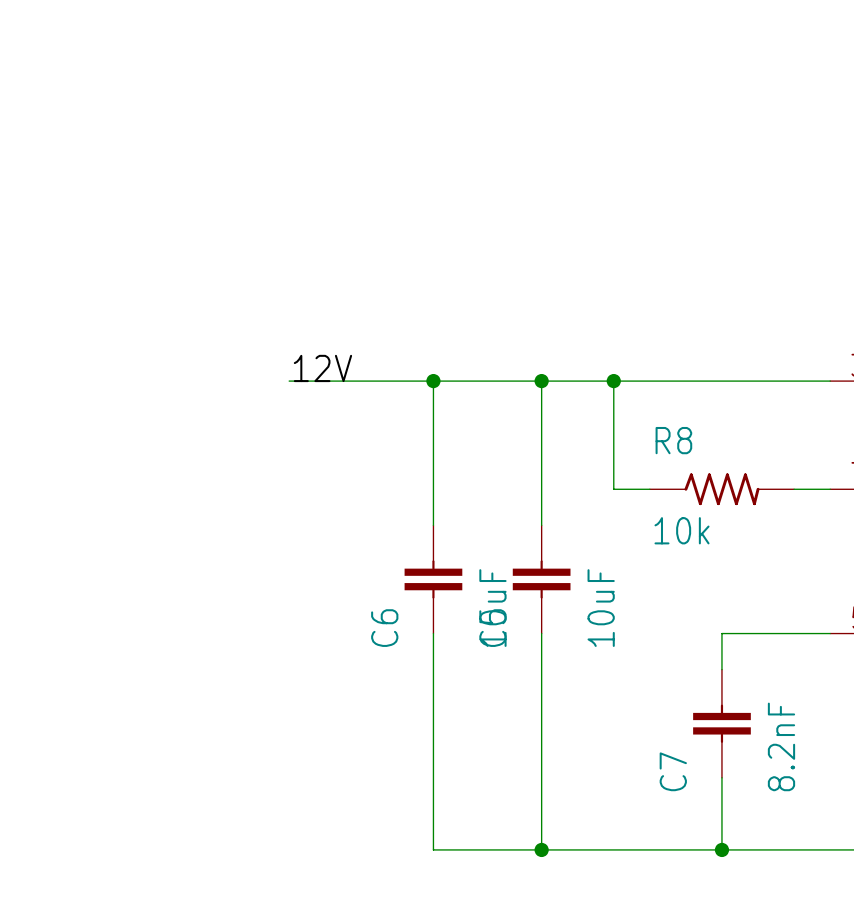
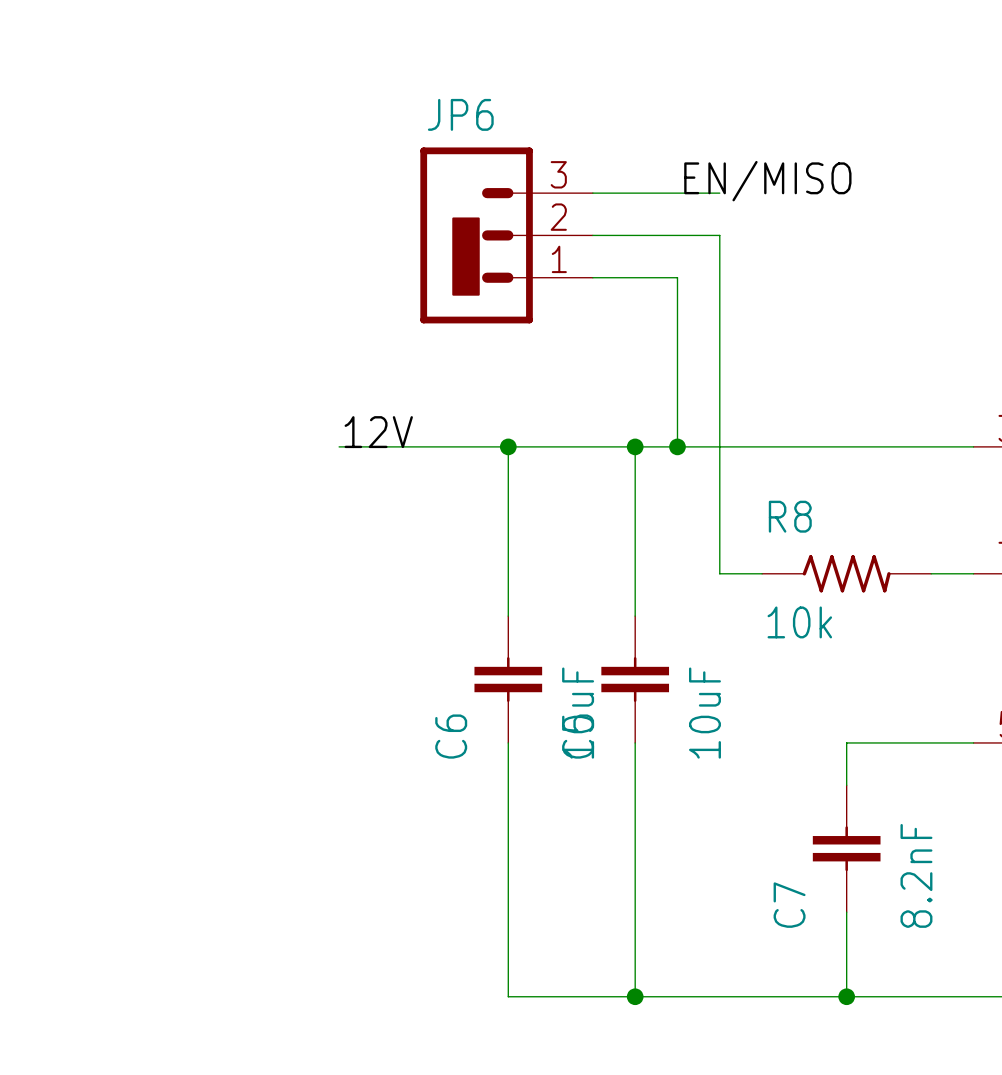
label: none -> EN/MISO (767, 181)
wire: none -> (592, 193) (719, 193)
JP6: none -> (506, 235)
wire: none -> (592, 235) (719, 235) (719, 446)
wire: none -> (592, 277) (677, 277) (677, 446)
junction position: (613, 381) -> (677, 446)

